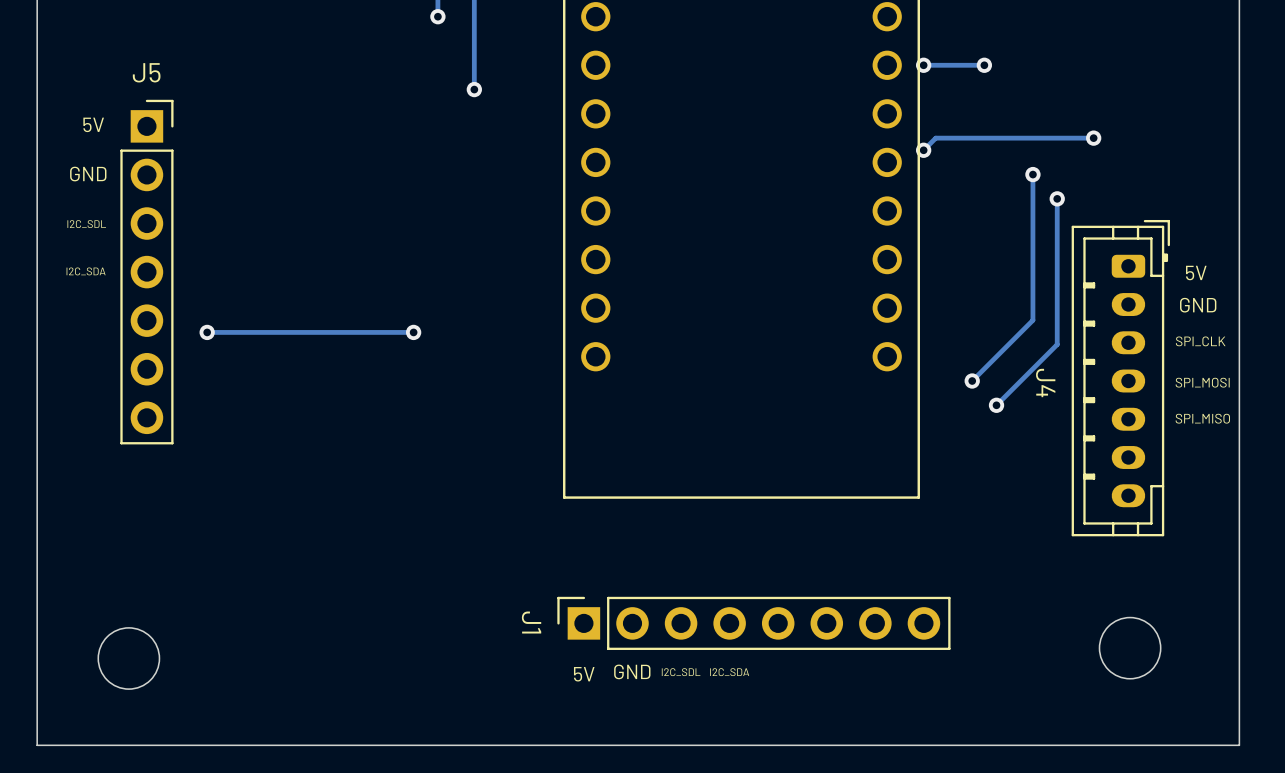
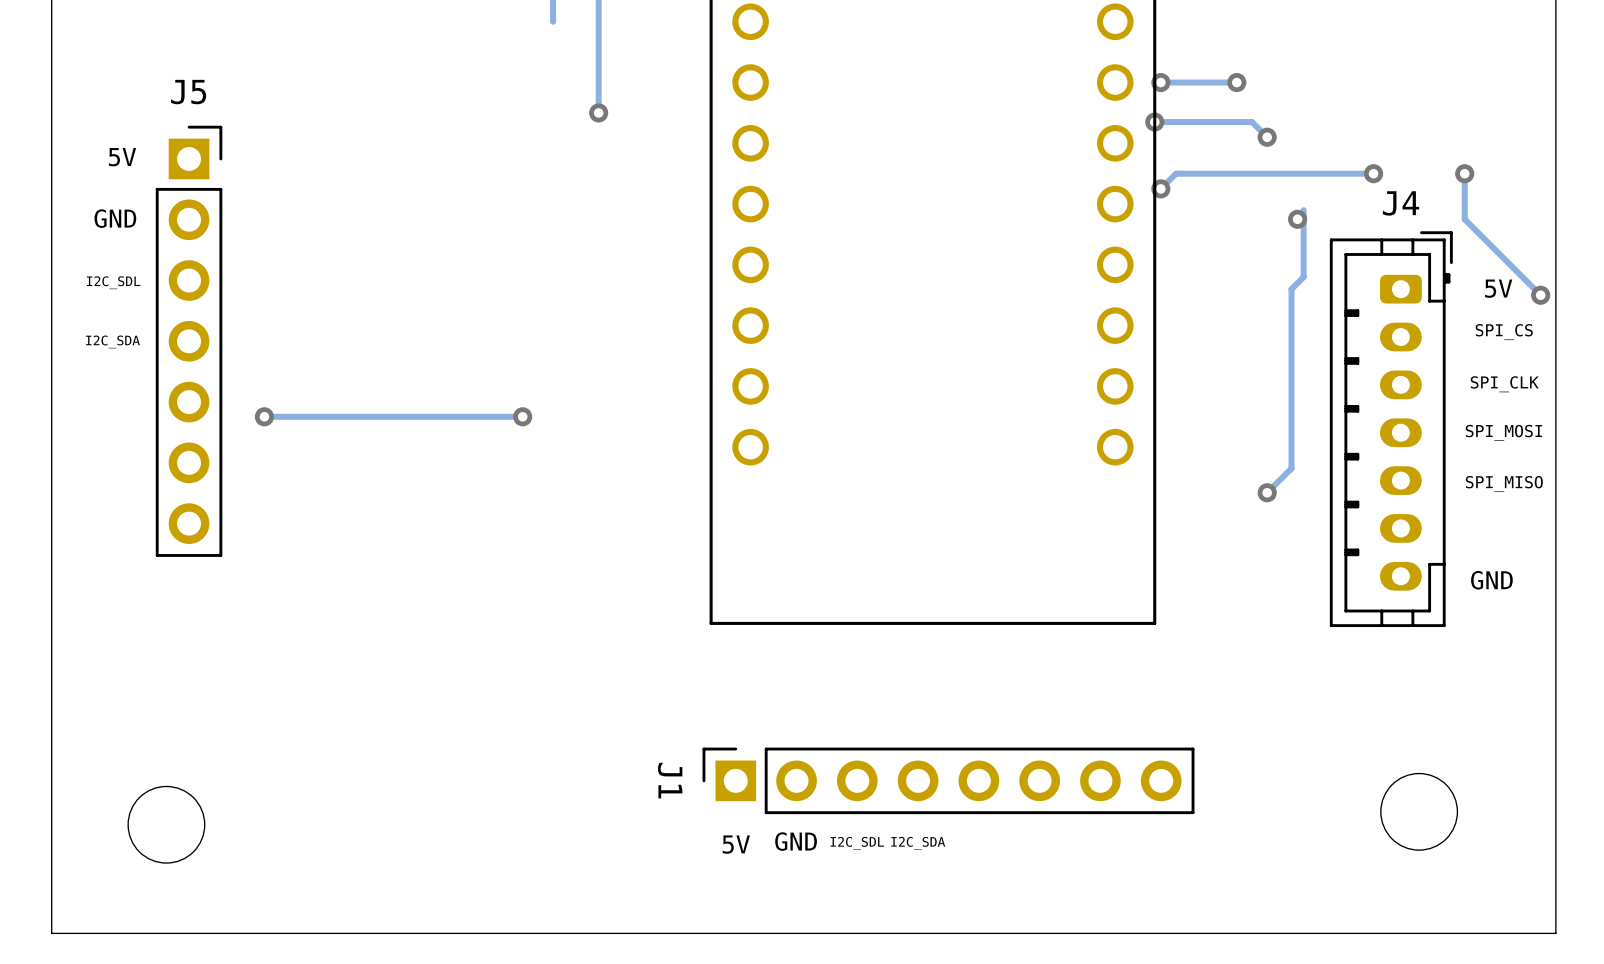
via: (437, 16) -> none
track: none -> (1154, 122) (1252, 122) (1267, 137)
via: none -> (1154, 122)
via: none -> (1267, 137)
track: none -> (1464, 173) (1464, 219) (1540, 295)
via: none -> (1464, 173)
track: (1032, 174) (1032, 320) (972, 381) -> none
track: (1057, 198) (1057, 344) (1028, 373) -> (1303, 210) (1303, 277) (1291, 289) (1291, 468)
via: (1057, 198) -> none
via: none -> (1540, 295)
text: none -> SPI_CS (1504, 332)
text position: 5V (1196, 273) -> 5V (1498, 288)
text: GND (1198, 305) -> SPI_CLK (1504, 384)
text: SPI_CLK (1200, 341) -> none
J4 position: (1120, 378) -> (1391, 429)
via: (972, 381) -> none
text position: SPI_MOSI (1202, 382) -> SPI_MOSI (1503, 432)
J4 name rotation: 0° (1045, 383) -> 90° counterclockwise (1400, 203)
J4 name position: J4 (1045, 383) -> J4 (1400, 203)
track: (1008, 393) (996, 405) -> none
via position: (996, 405) -> (1267, 492)
text position: SPI_MISO (1202, 418) -> SPI_MISO (1504, 484)
text: none -> GND (1491, 580)

